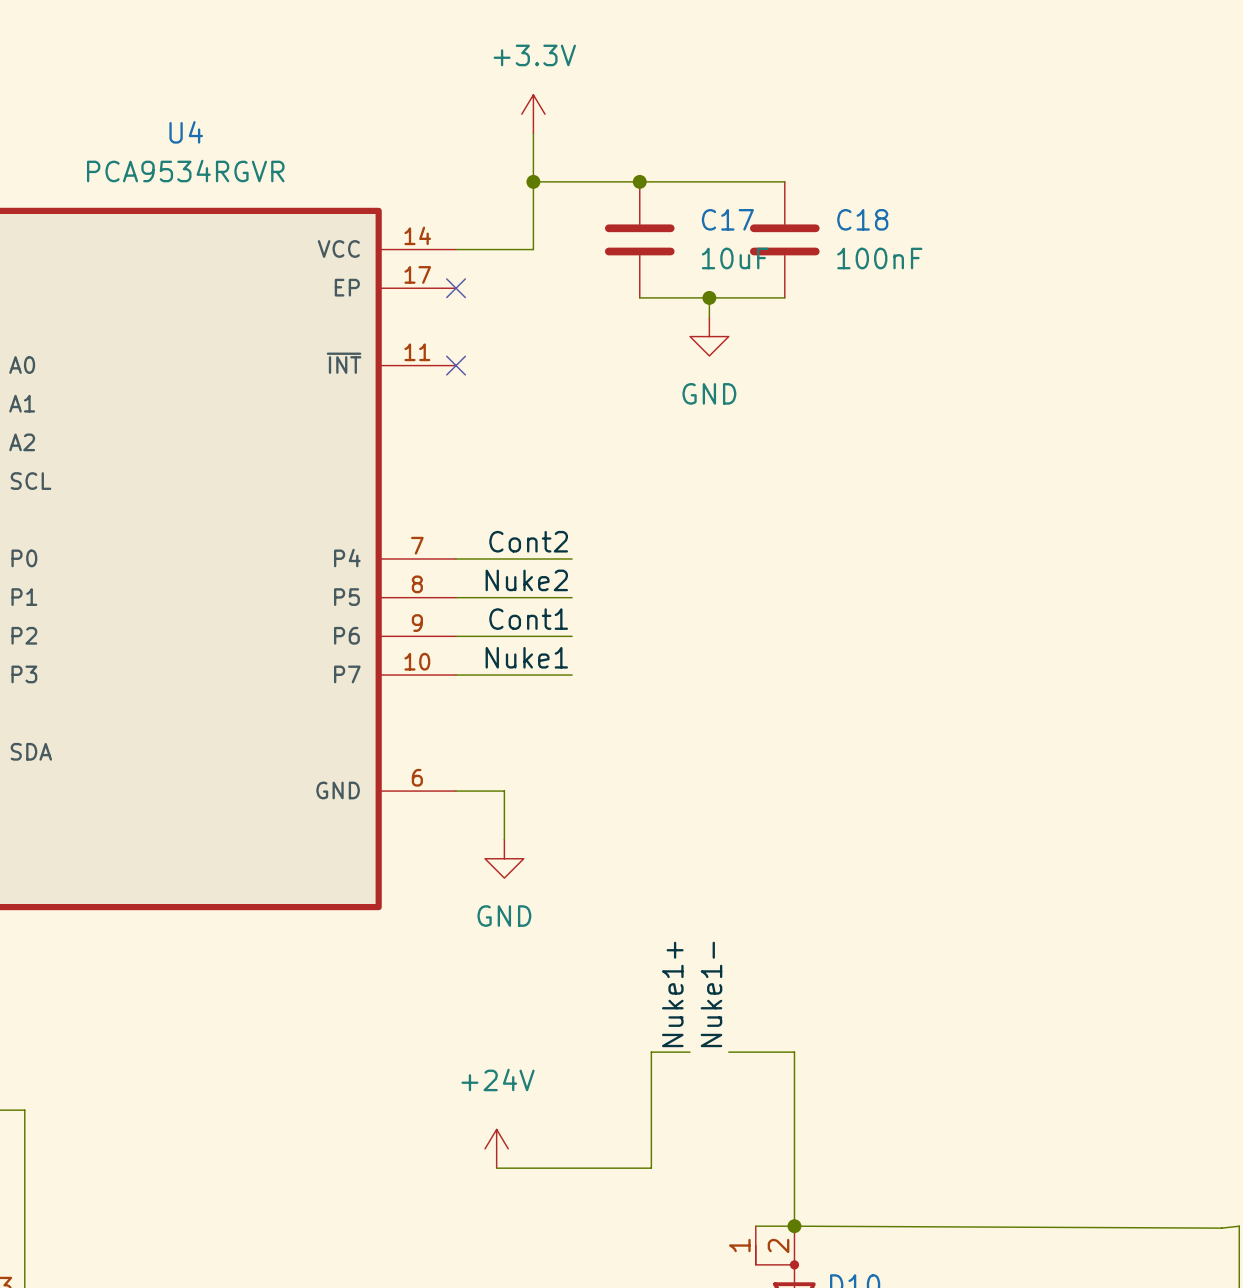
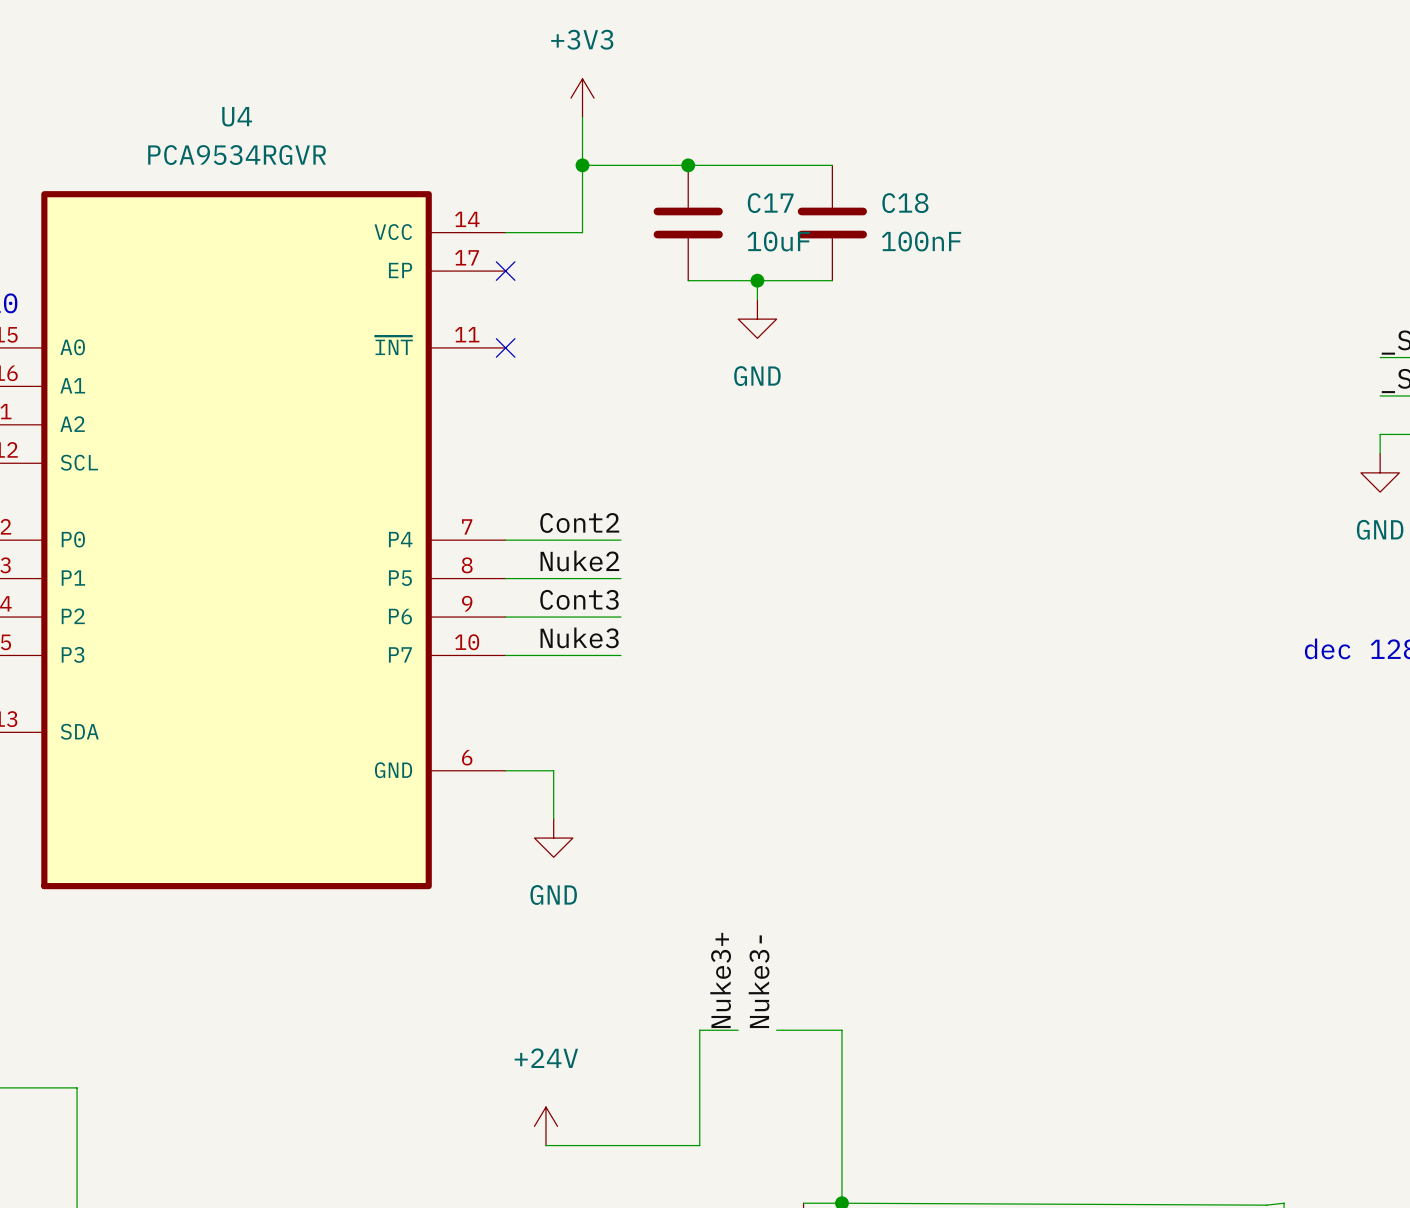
power symbol: +3.3V (533, 114) -> +3V3 (582, 98)
label: Cont1 (528, 619) -> Cont3 (579, 599)
label: Nuke1 (526, 657) -> Nuke3 (579, 637)
label: Nuke1+ (672, 994) -> Nuke3+ (720, 980)
label: Nuke1- (711, 994) -> Nuke3- (759, 981)

